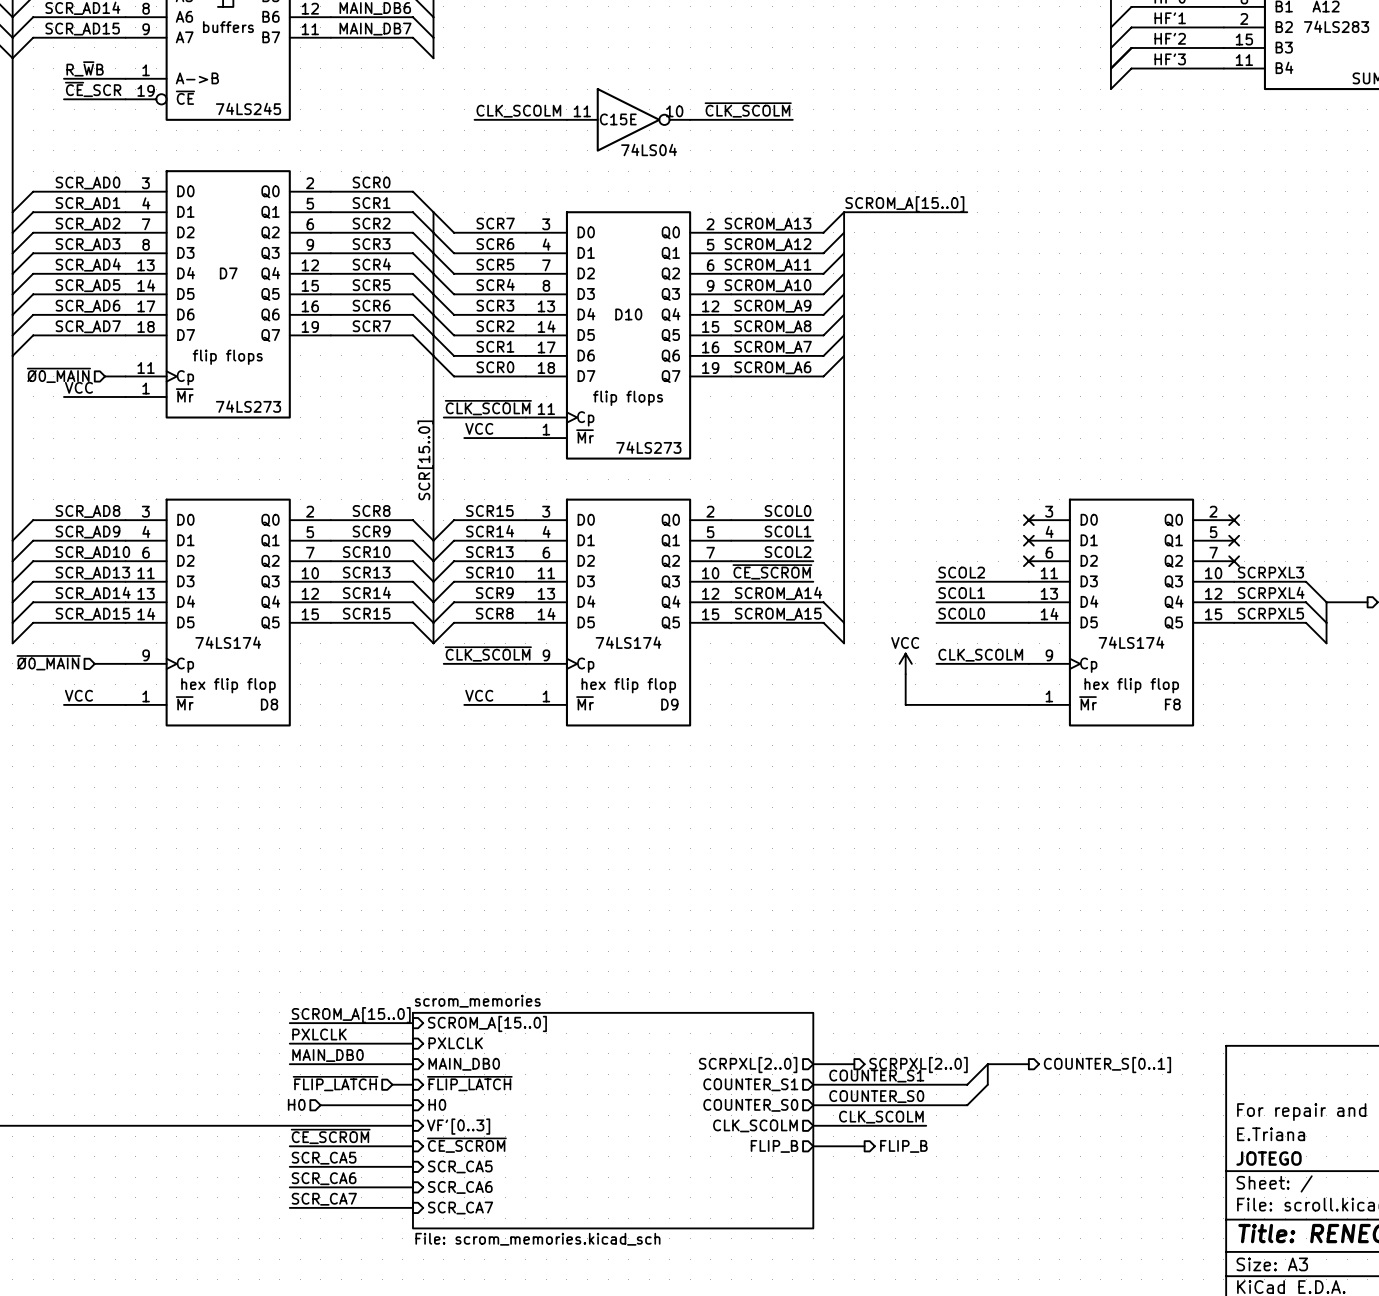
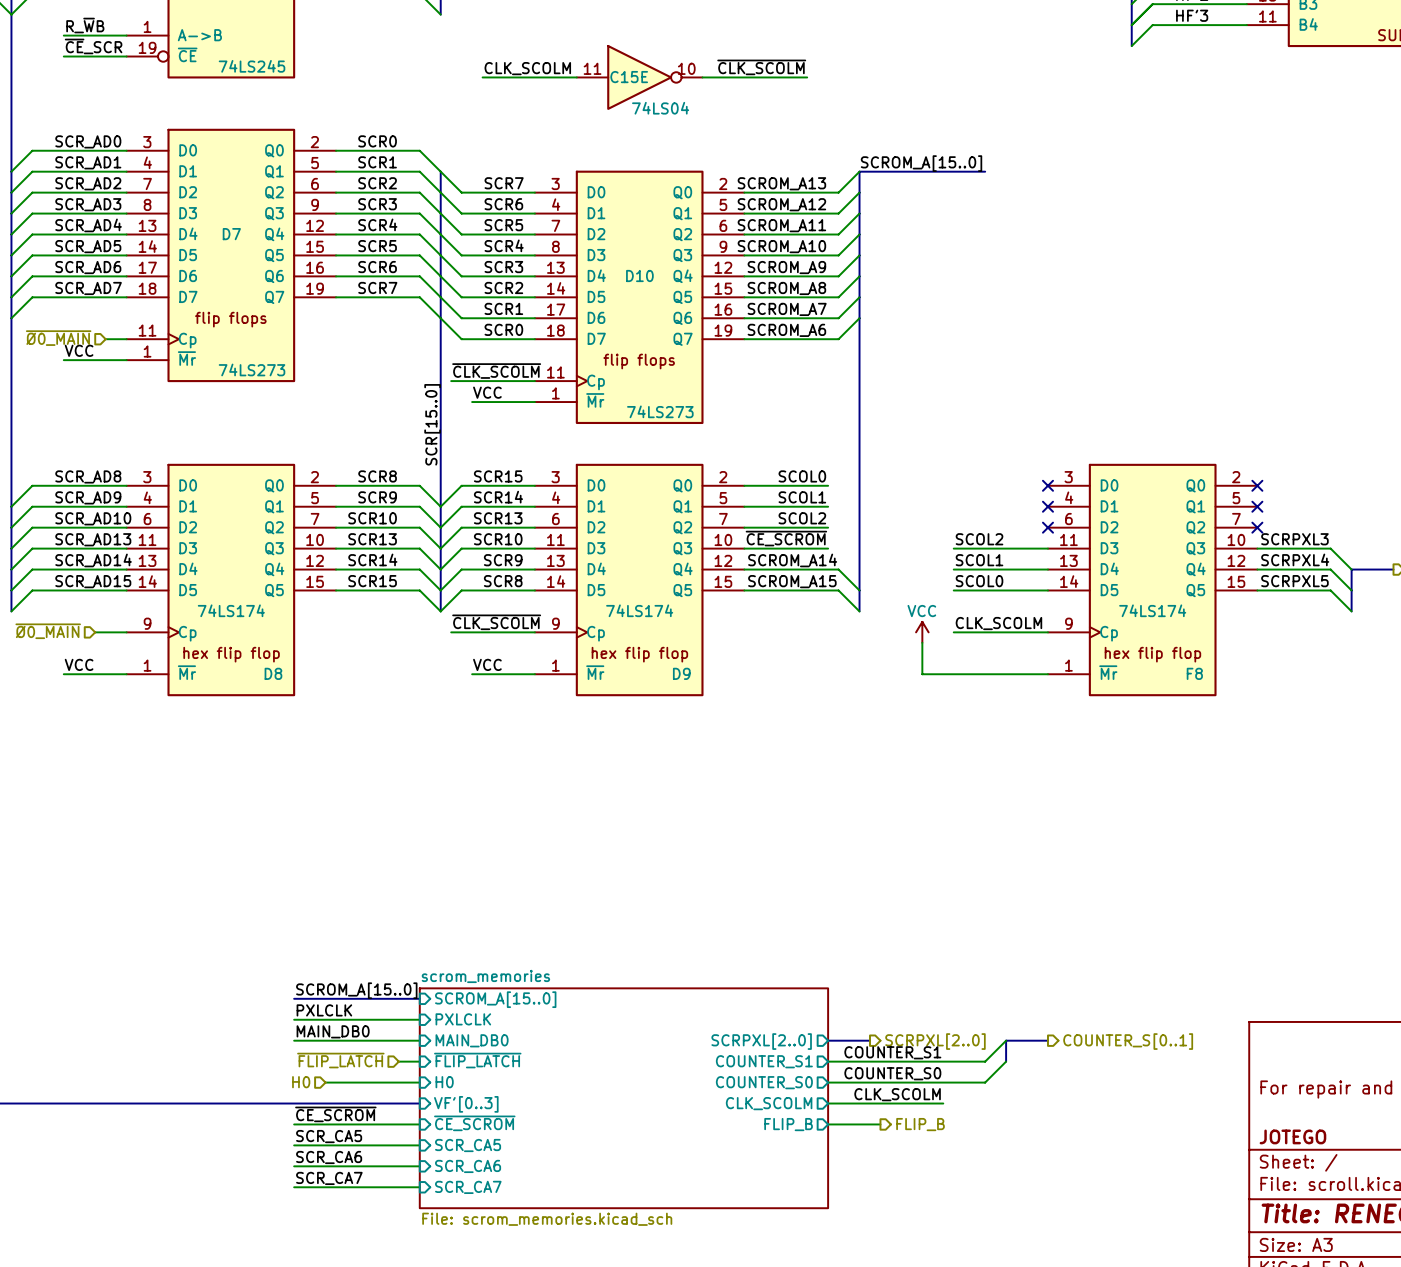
title block: E.Triana (1271, 1134) -> none

